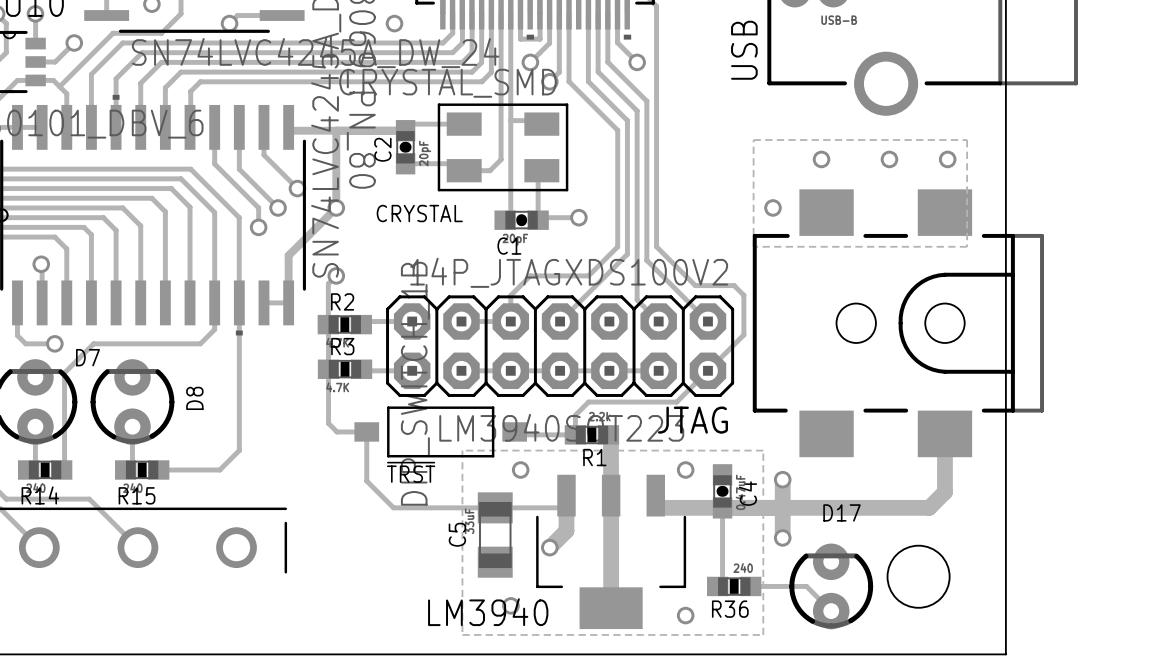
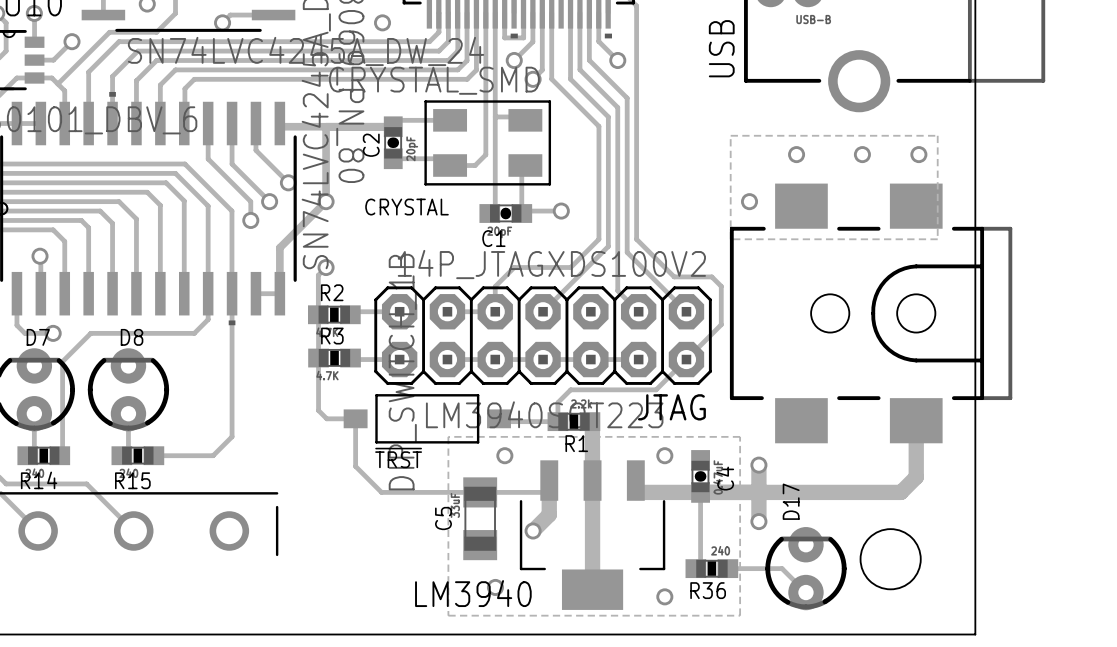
D7 name position: D7 (87, 357) -> D7 (38, 337)
D8 name rotation: 0° (194, 398) -> 90° clockwise (132, 337)
D8 name position: D8 (194, 398) -> D8 (132, 337)
D17 name rotation: 0° (842, 512) -> 90° counterclockwise (791, 501)

